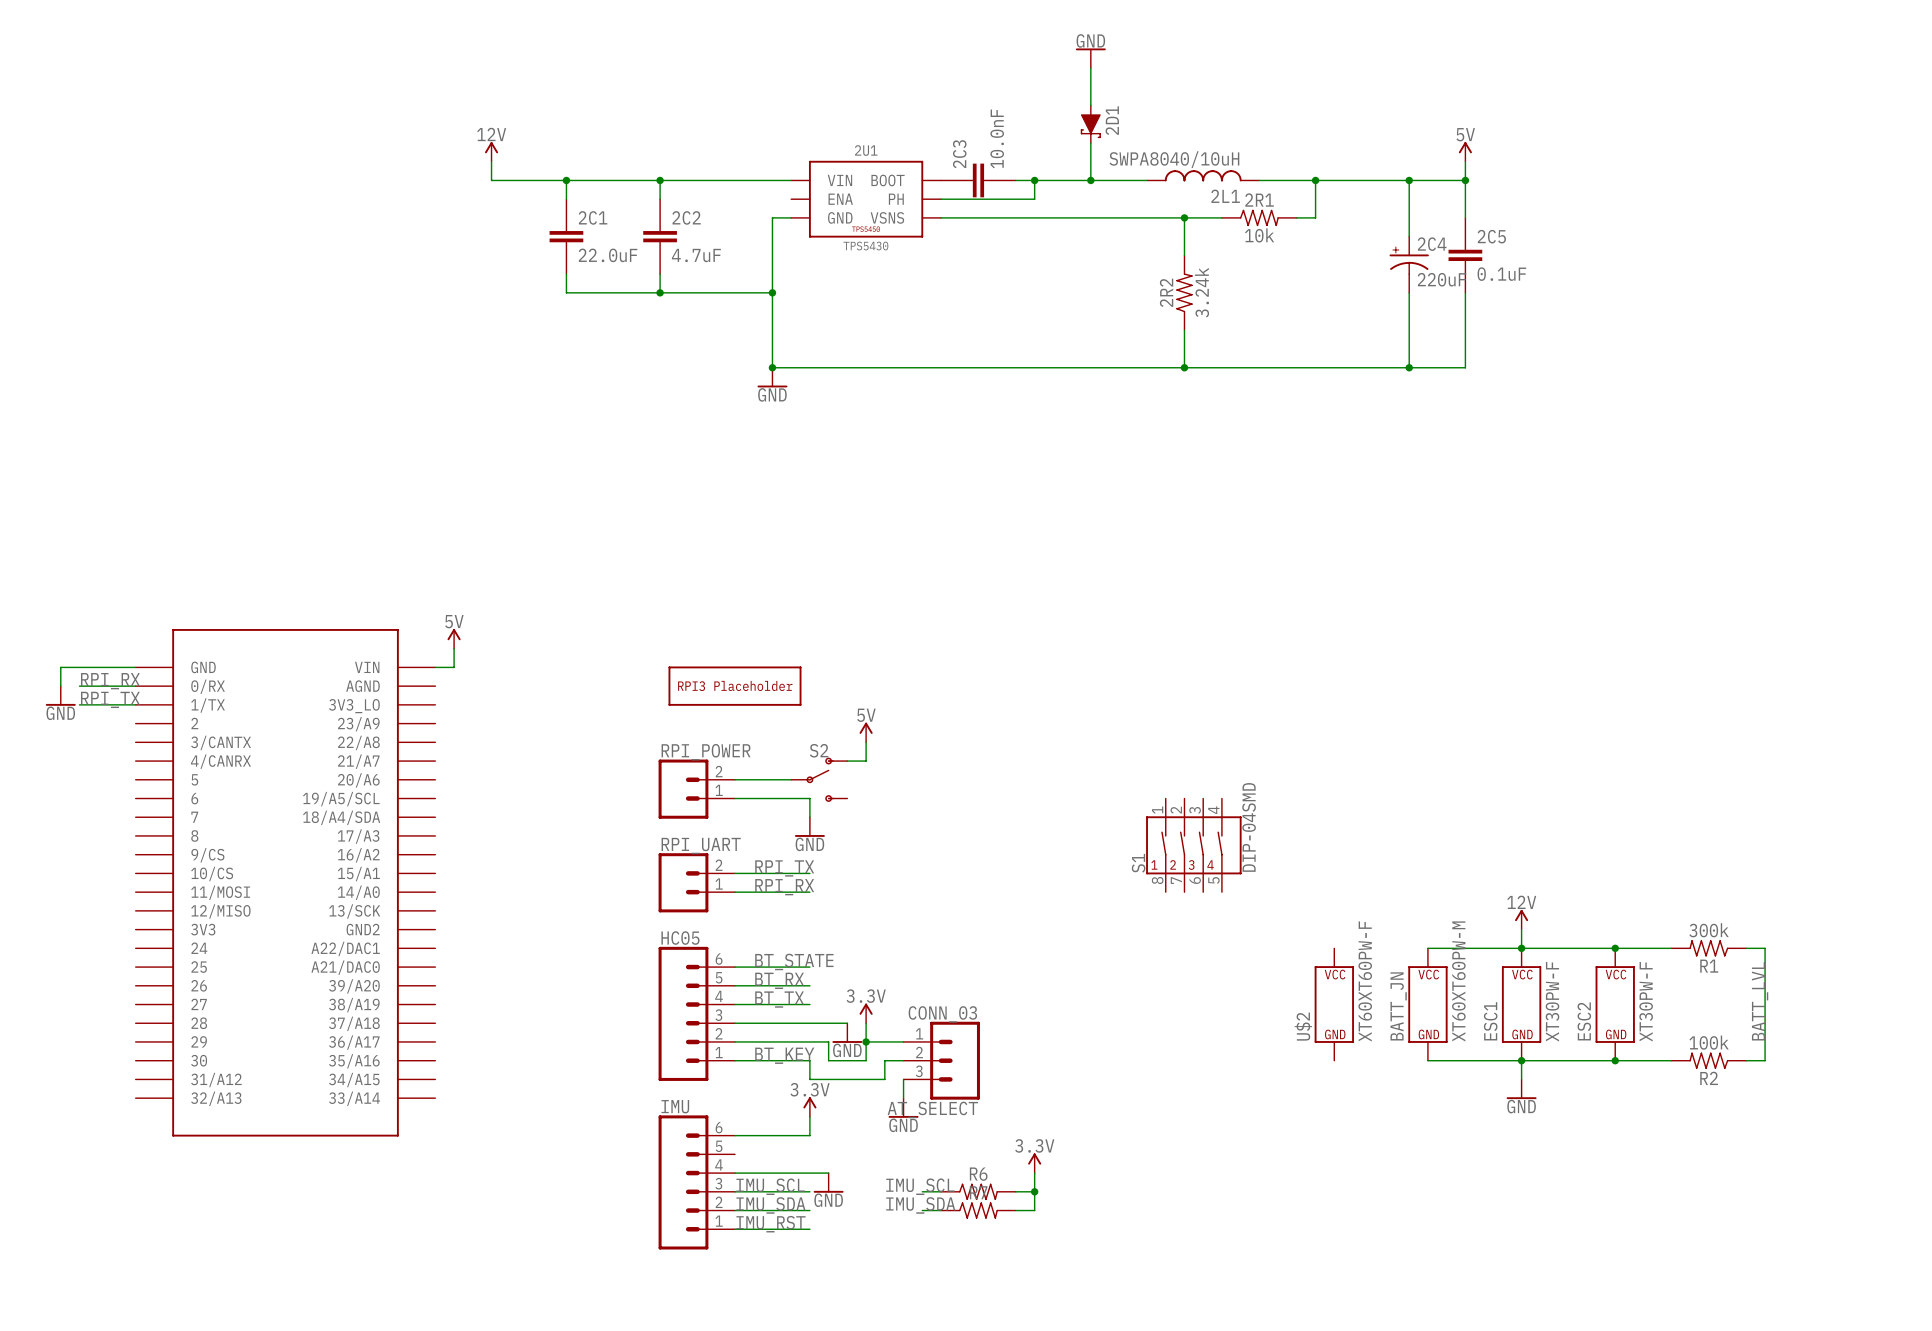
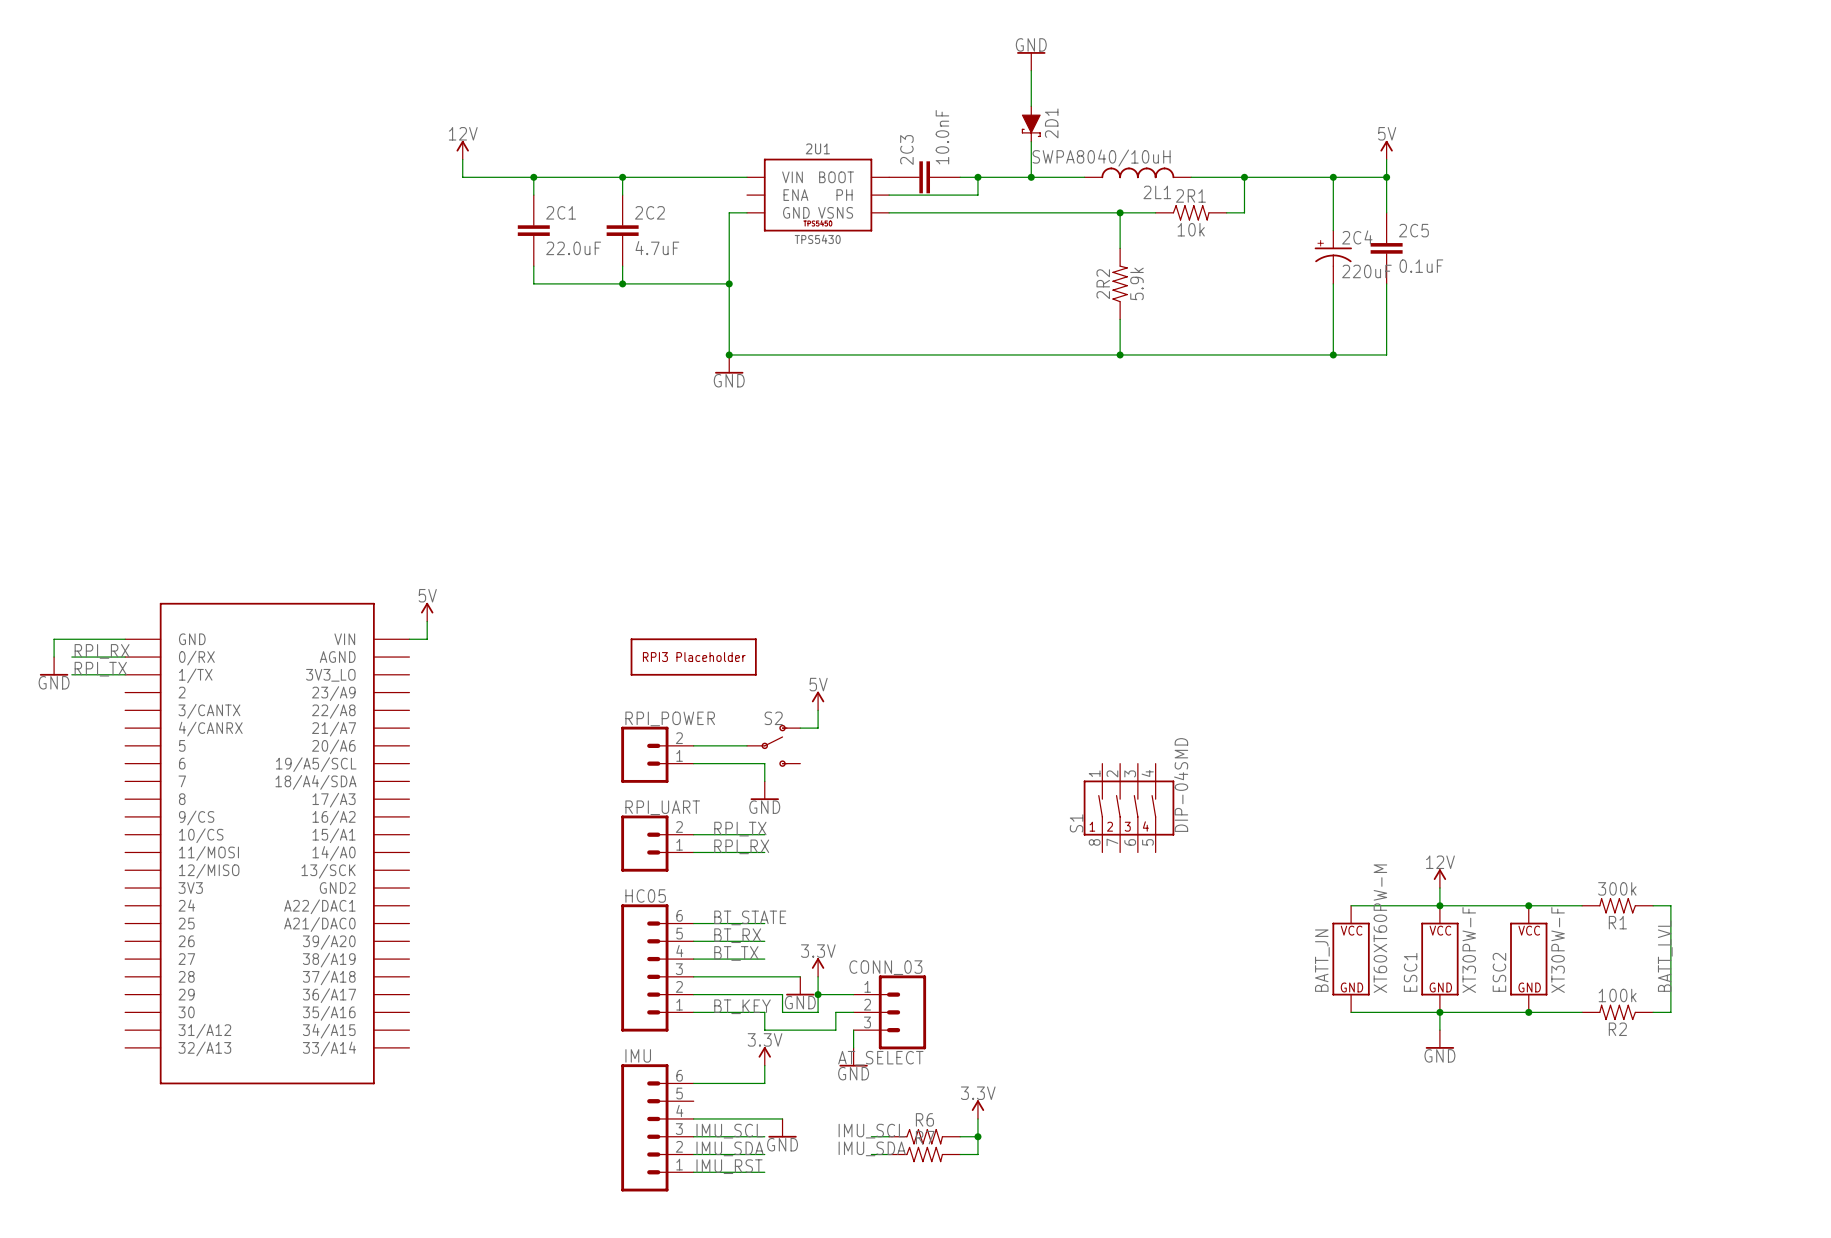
2R2 value: 3.24k (1201, 292) -> 5.9k (1136, 283)
U$2: XT60XT60PW-F (1334, 1004) -> none

